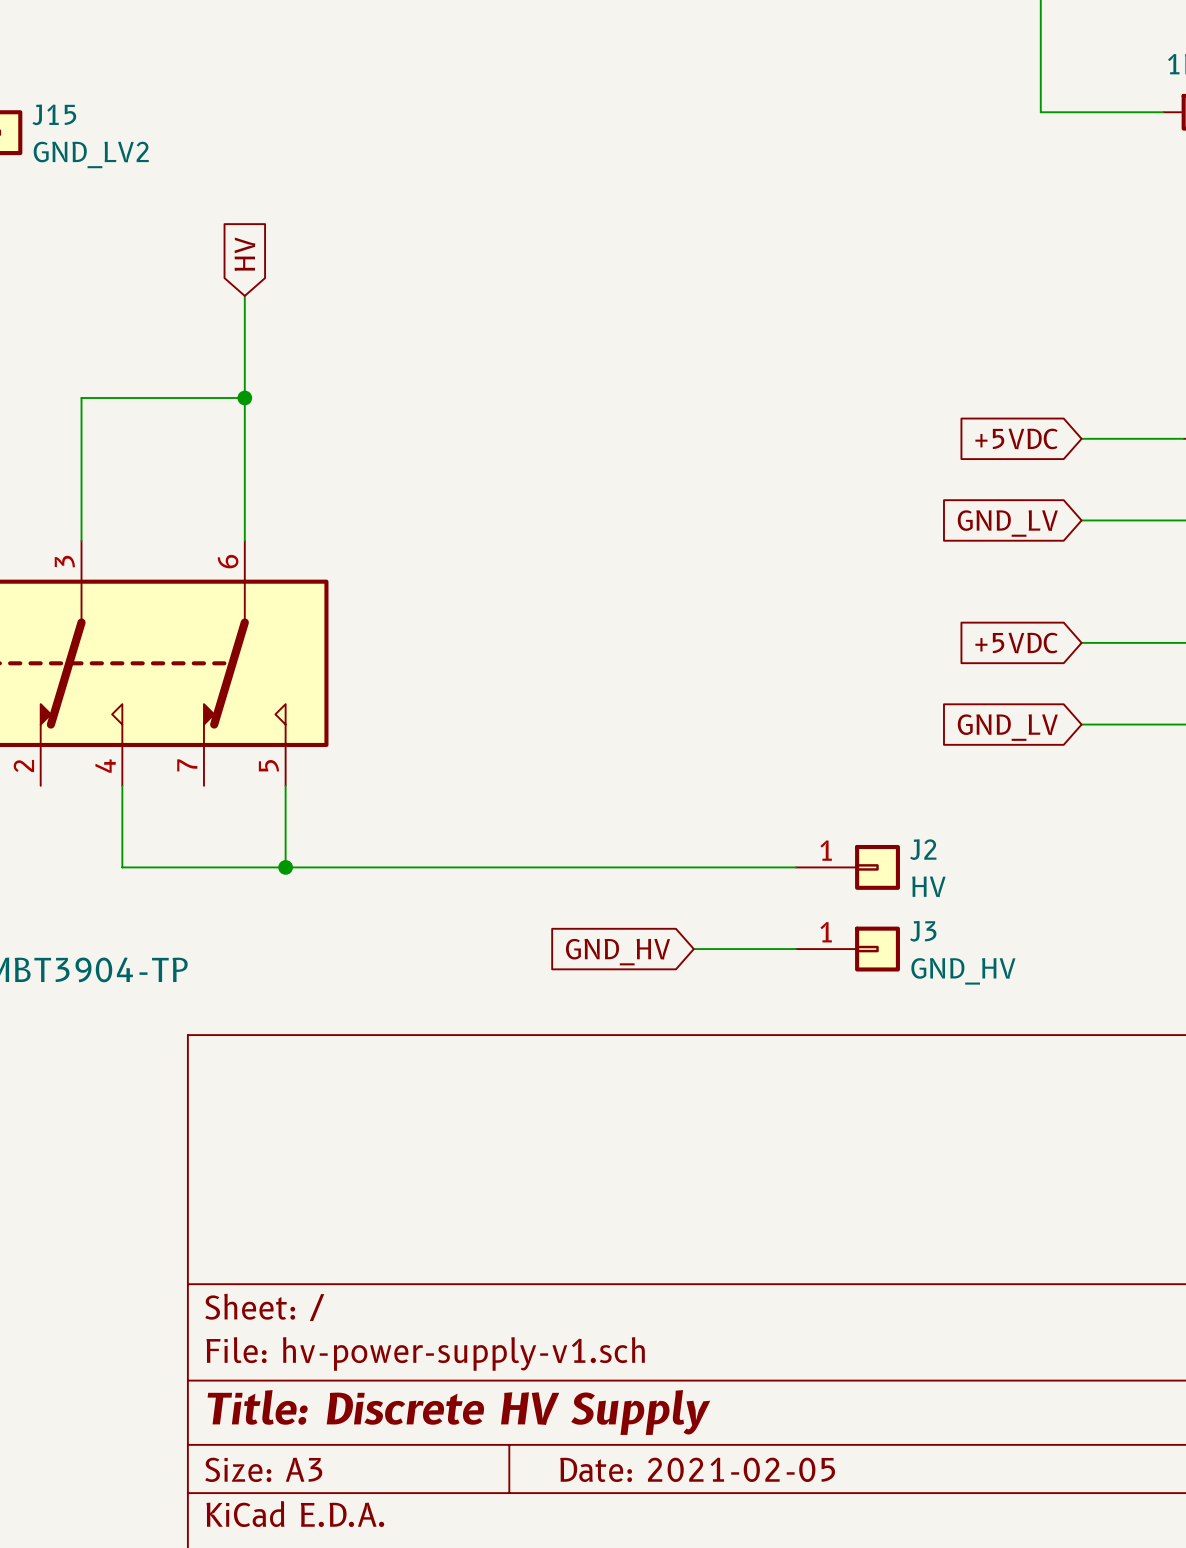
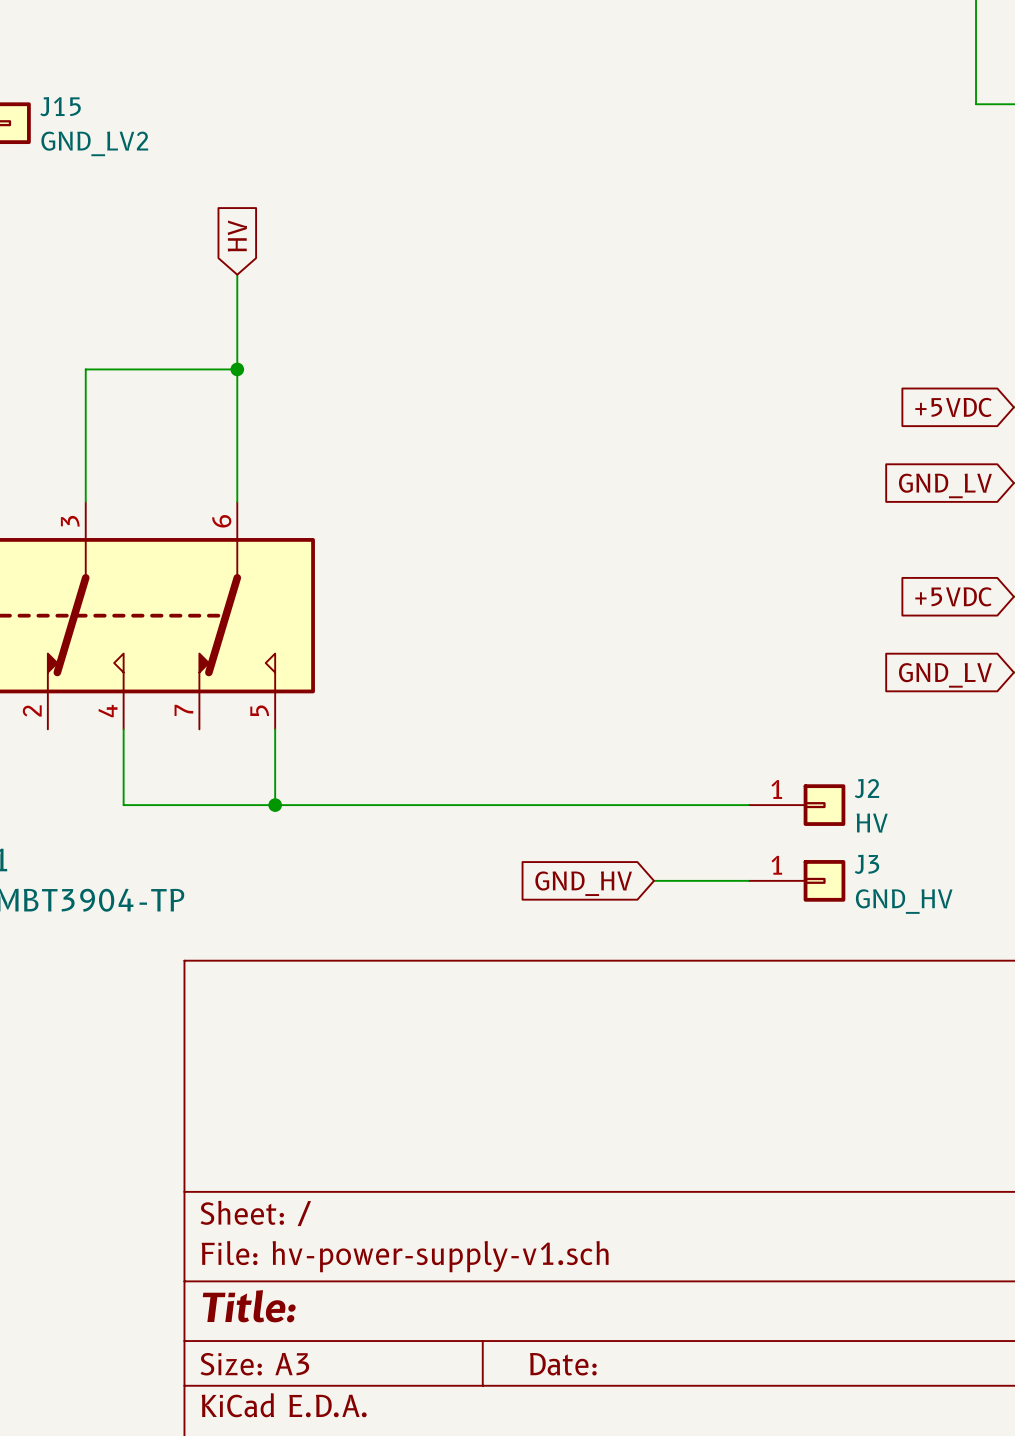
title block: Title: Discrete HV Supply (458, 1412) -> Title: (249, 1306)
title block: Date: 2021-02-05 (697, 1469) -> Date: (563, 1364)

